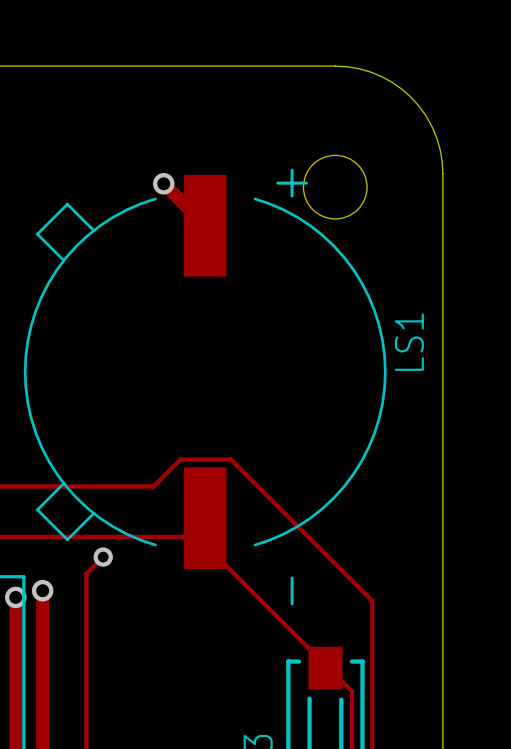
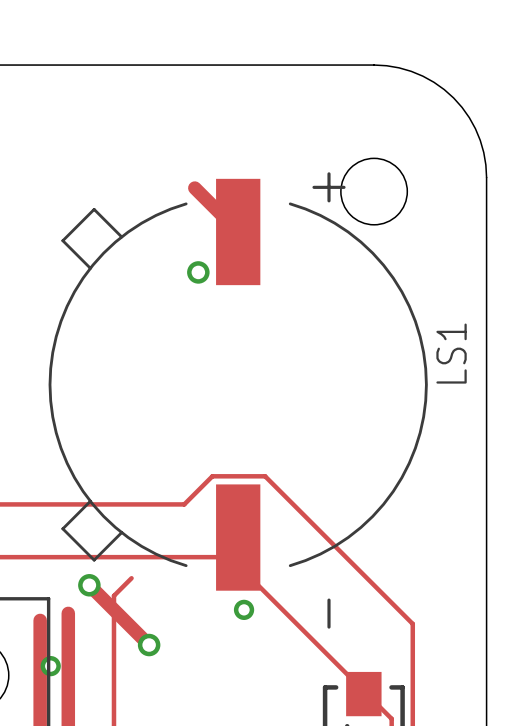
via position: (163, 183) -> (198, 272)
via: (103, 557) -> none
track: none -> (89, 585) (149, 645)
via: none -> (89, 585)
via: none -> (244, 609)
via: (42, 590) -> none
via: (15, 597) -> none
via: none -> (149, 645)
via: none -> (50, 666)

